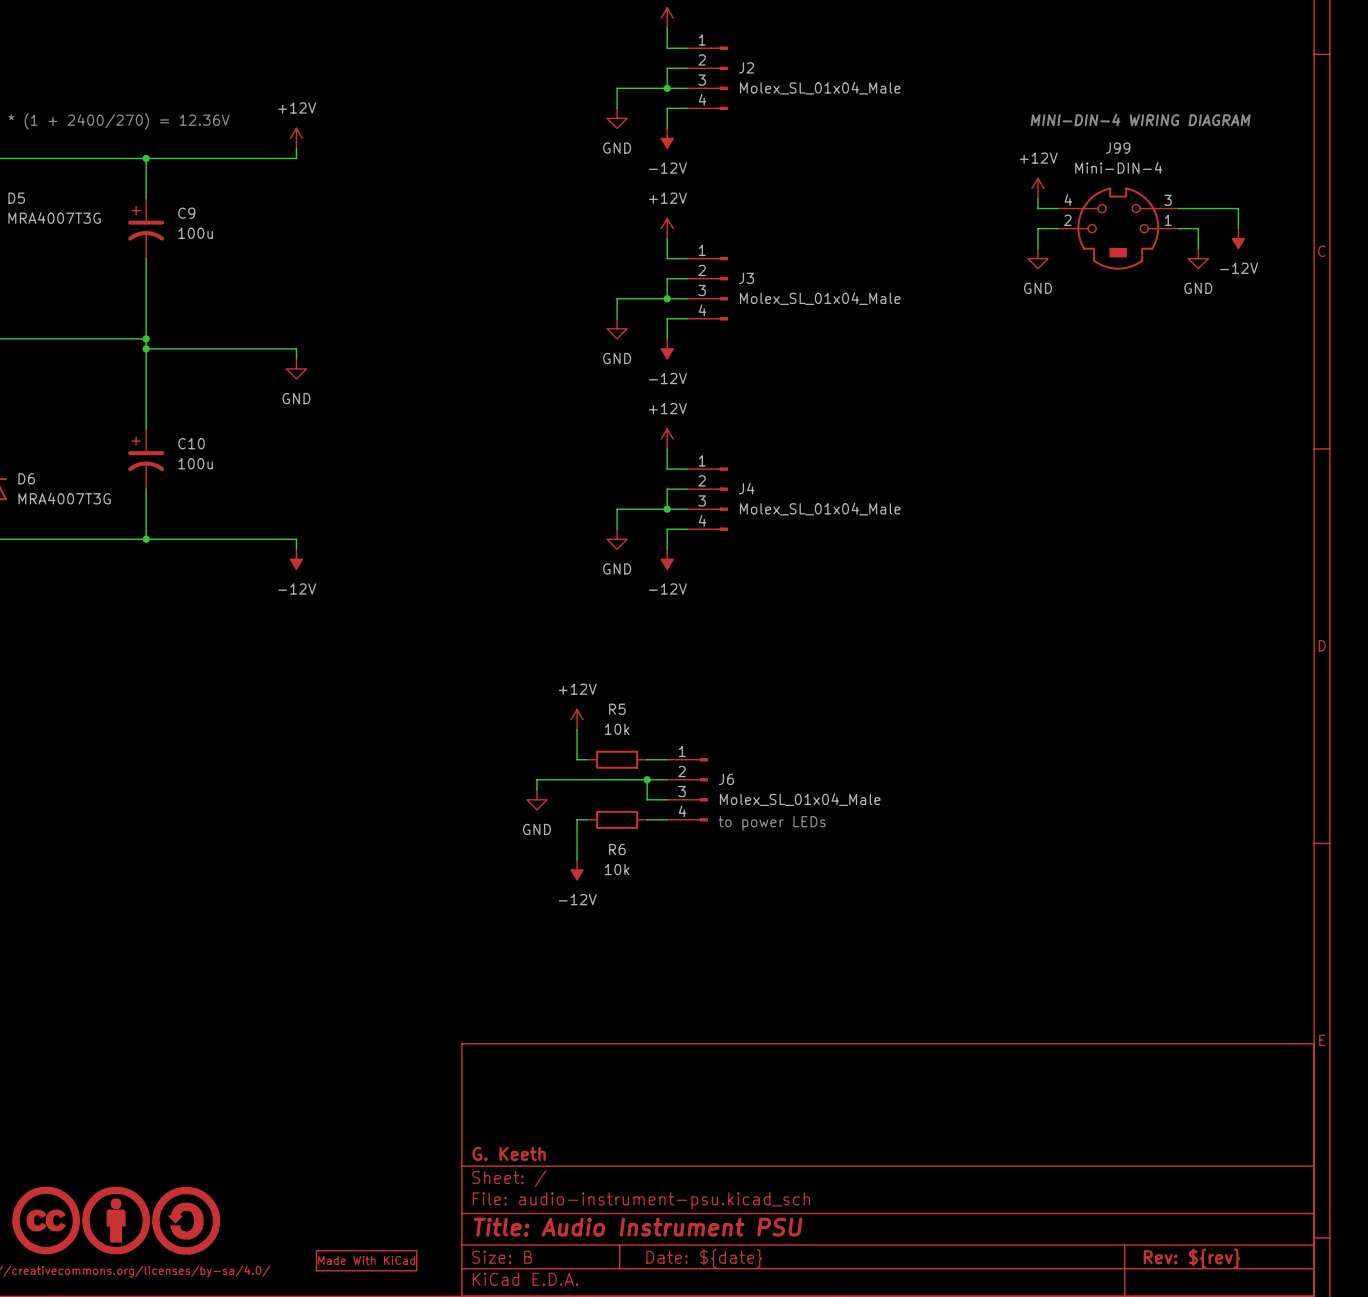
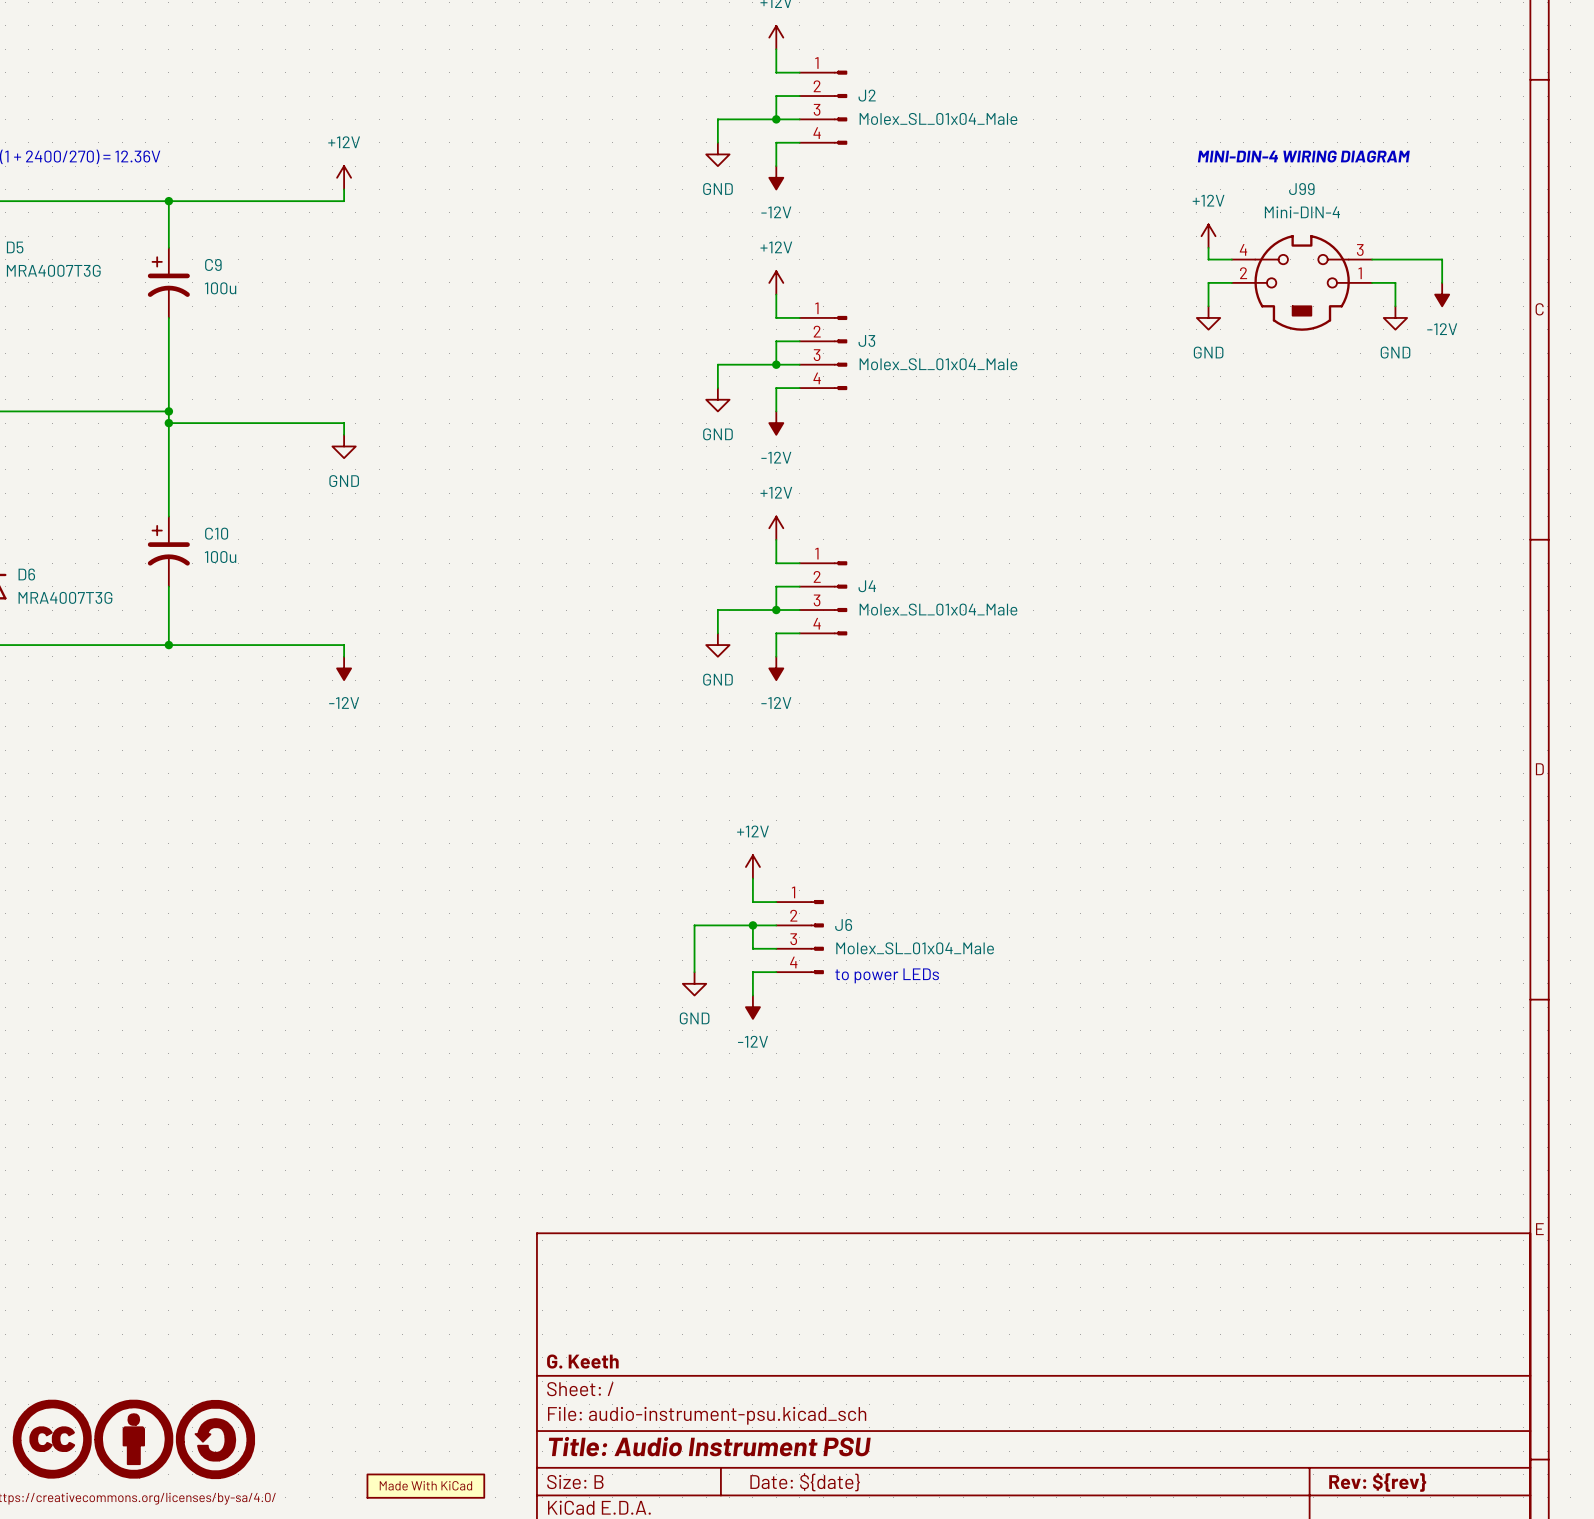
power symbol position: +12V (577, 719) -> +12V (752, 867)
wire: (577, 729) (577, 759) (587, 759) -> none
wire: none -> (752, 878) (752, 902)
R5: 10k (617, 759) -> none
wire: (597, 779) (536, 779) (536, 789) -> (694, 925) (694, 972)
power symbol position: GND (536, 799) -> GND (694, 983)
wire: (587, 819) (577, 819) (577, 859) -> none
R6: 10k (617, 819) -> none
wire: none -> (752, 972) (752, 995)
power symbol position: -12V (577, 869) -> -12V (752, 1007)

